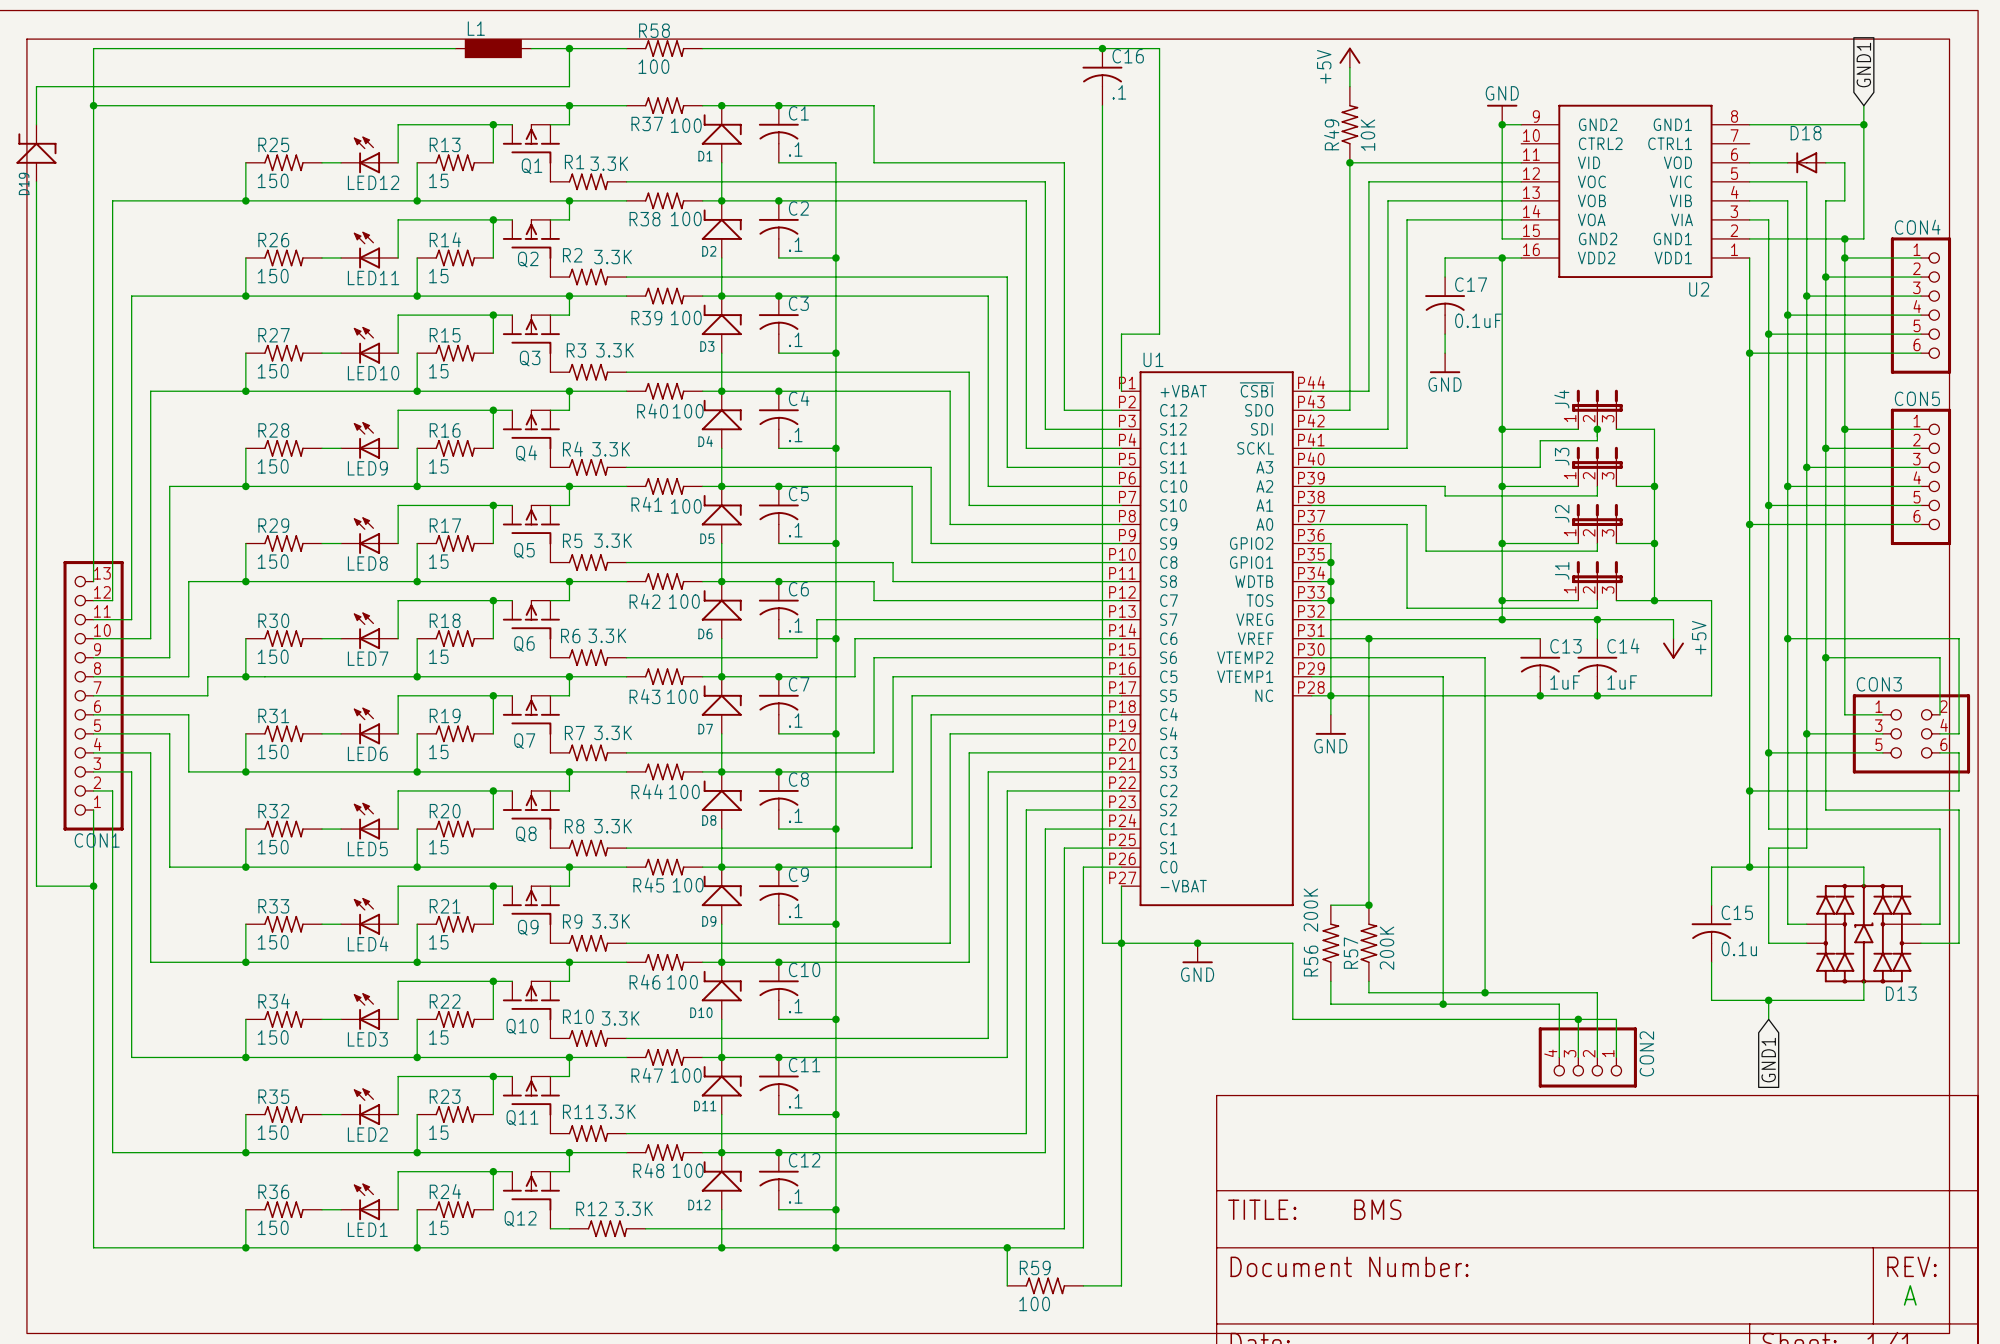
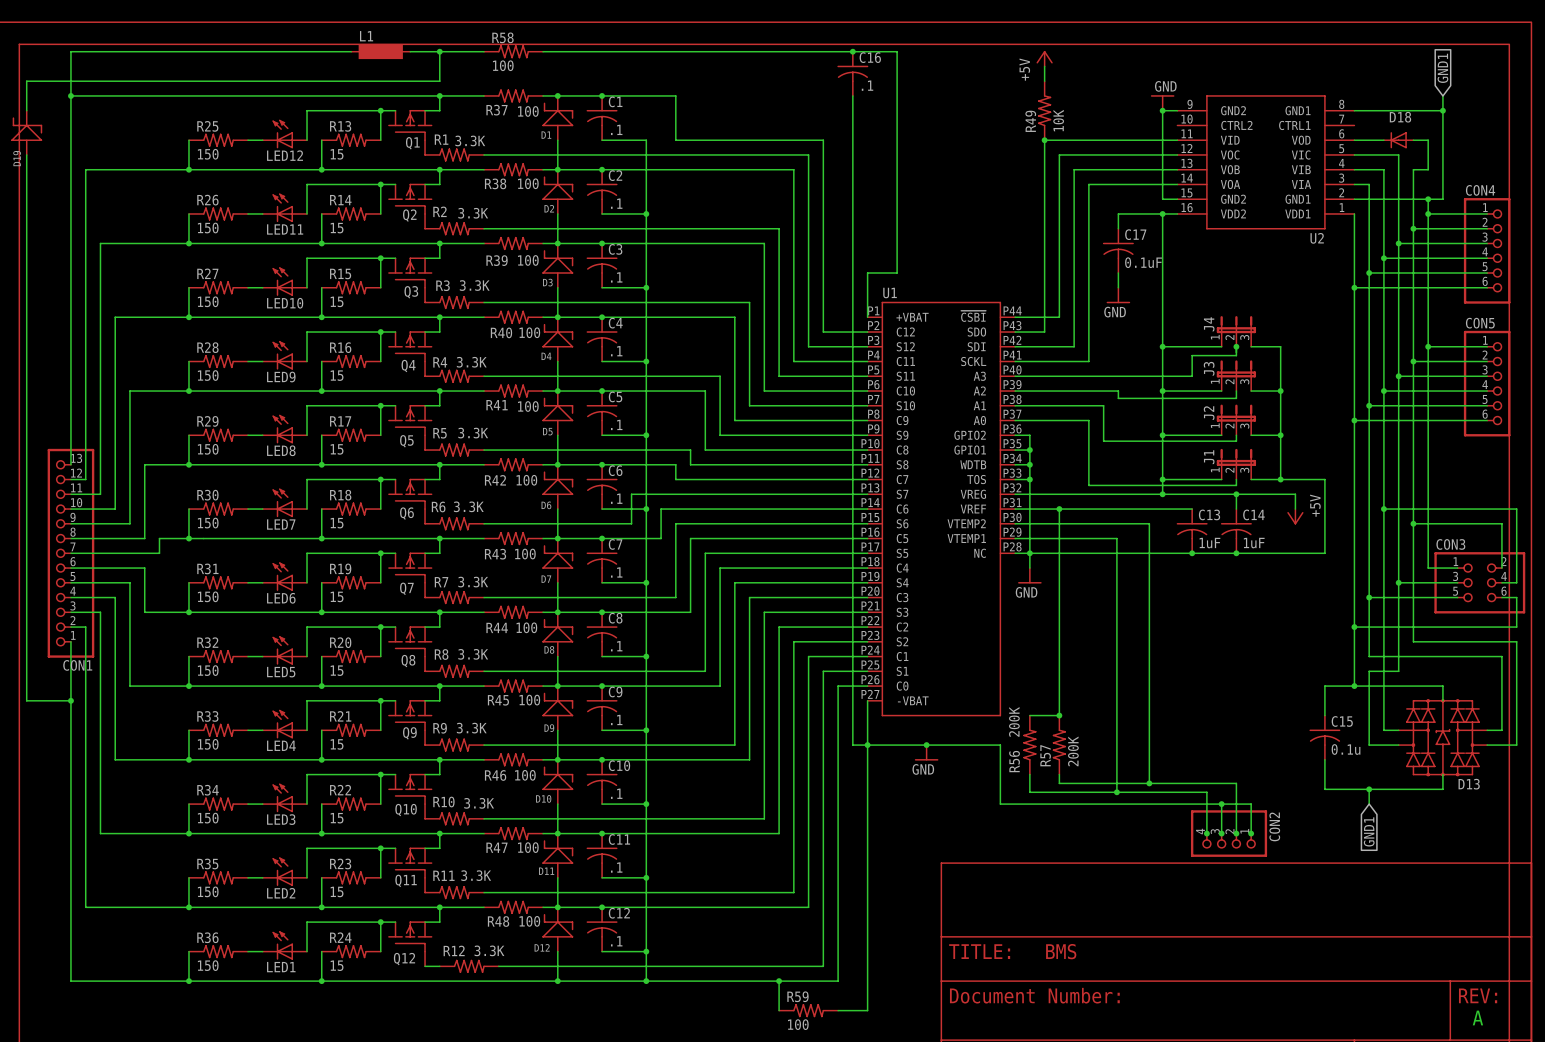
junction: none -> (1206, 833)
junction: none -> (1221, 833)
junction: none -> (1236, 833)
junction: none -> (1251, 833)

